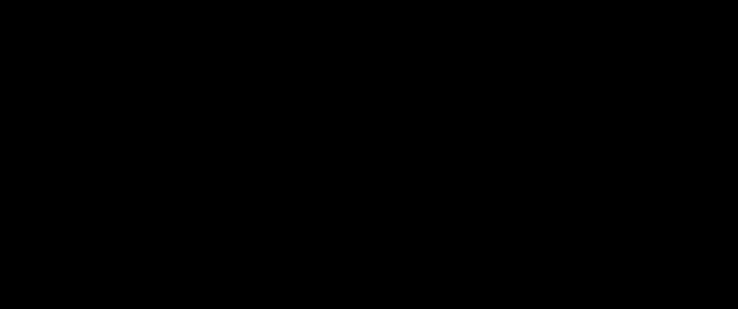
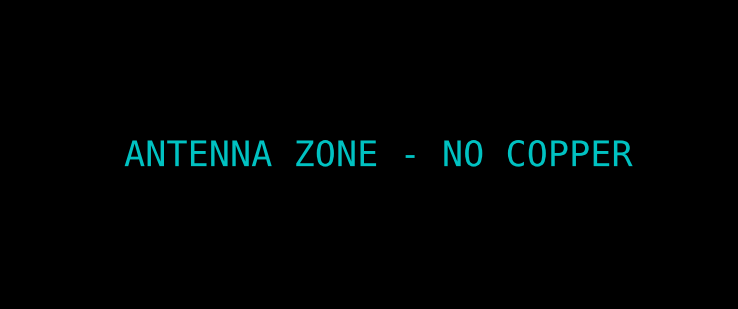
text: none -> ANTENNA ZONE - NO COPPER (378, 153)

